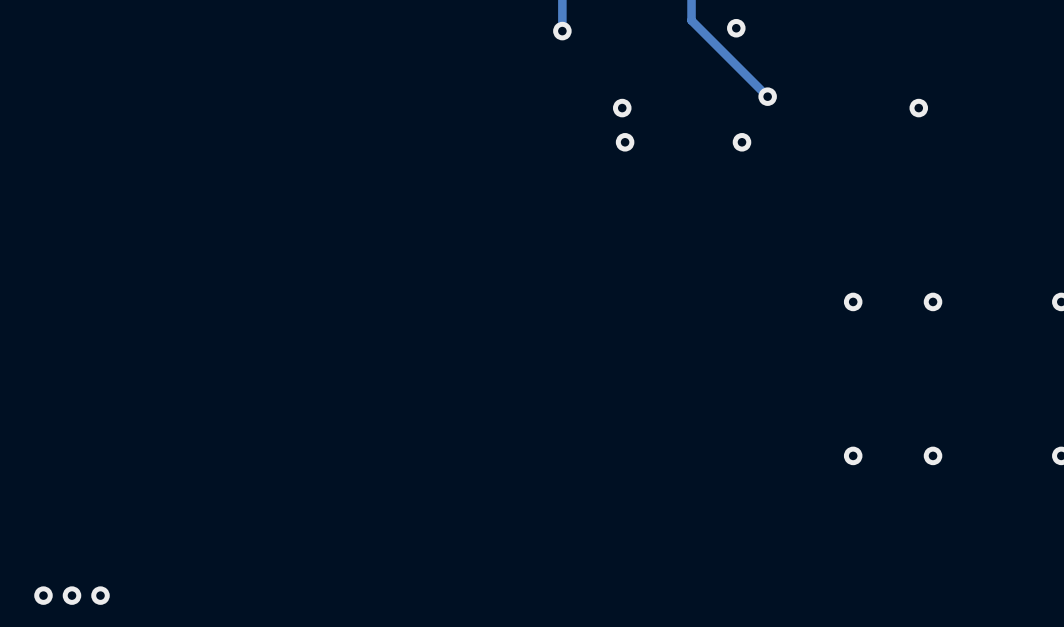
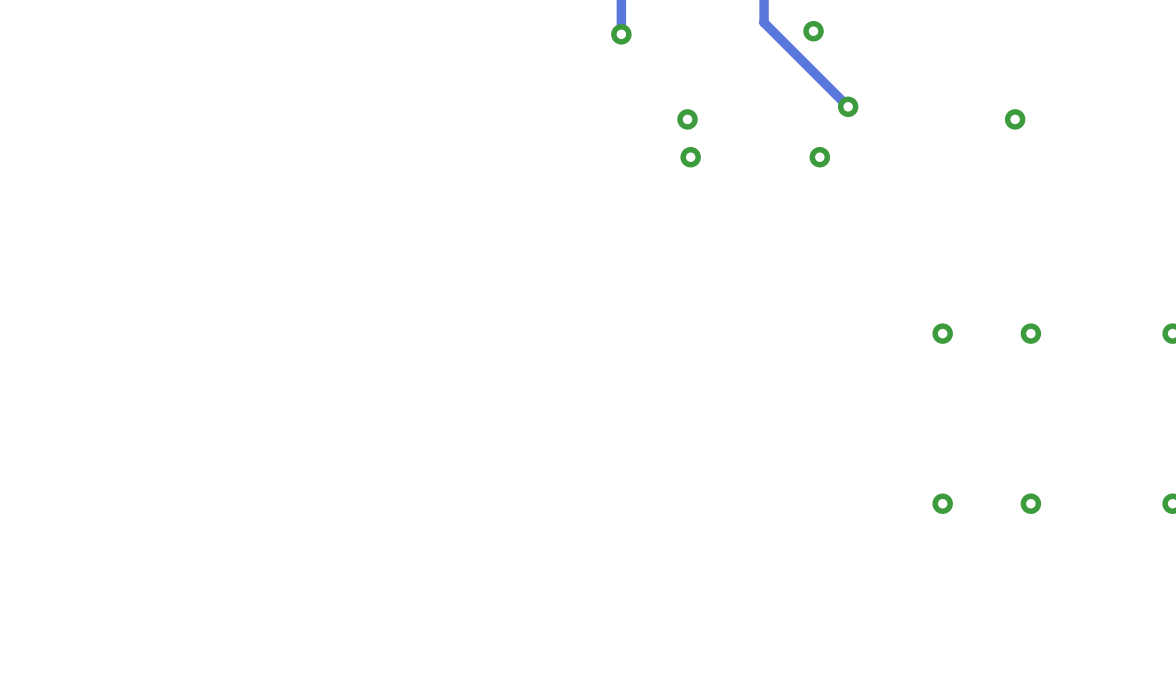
via: (43, 595) -> none
via: (71, 595) -> none
via: (100, 595) -> none

